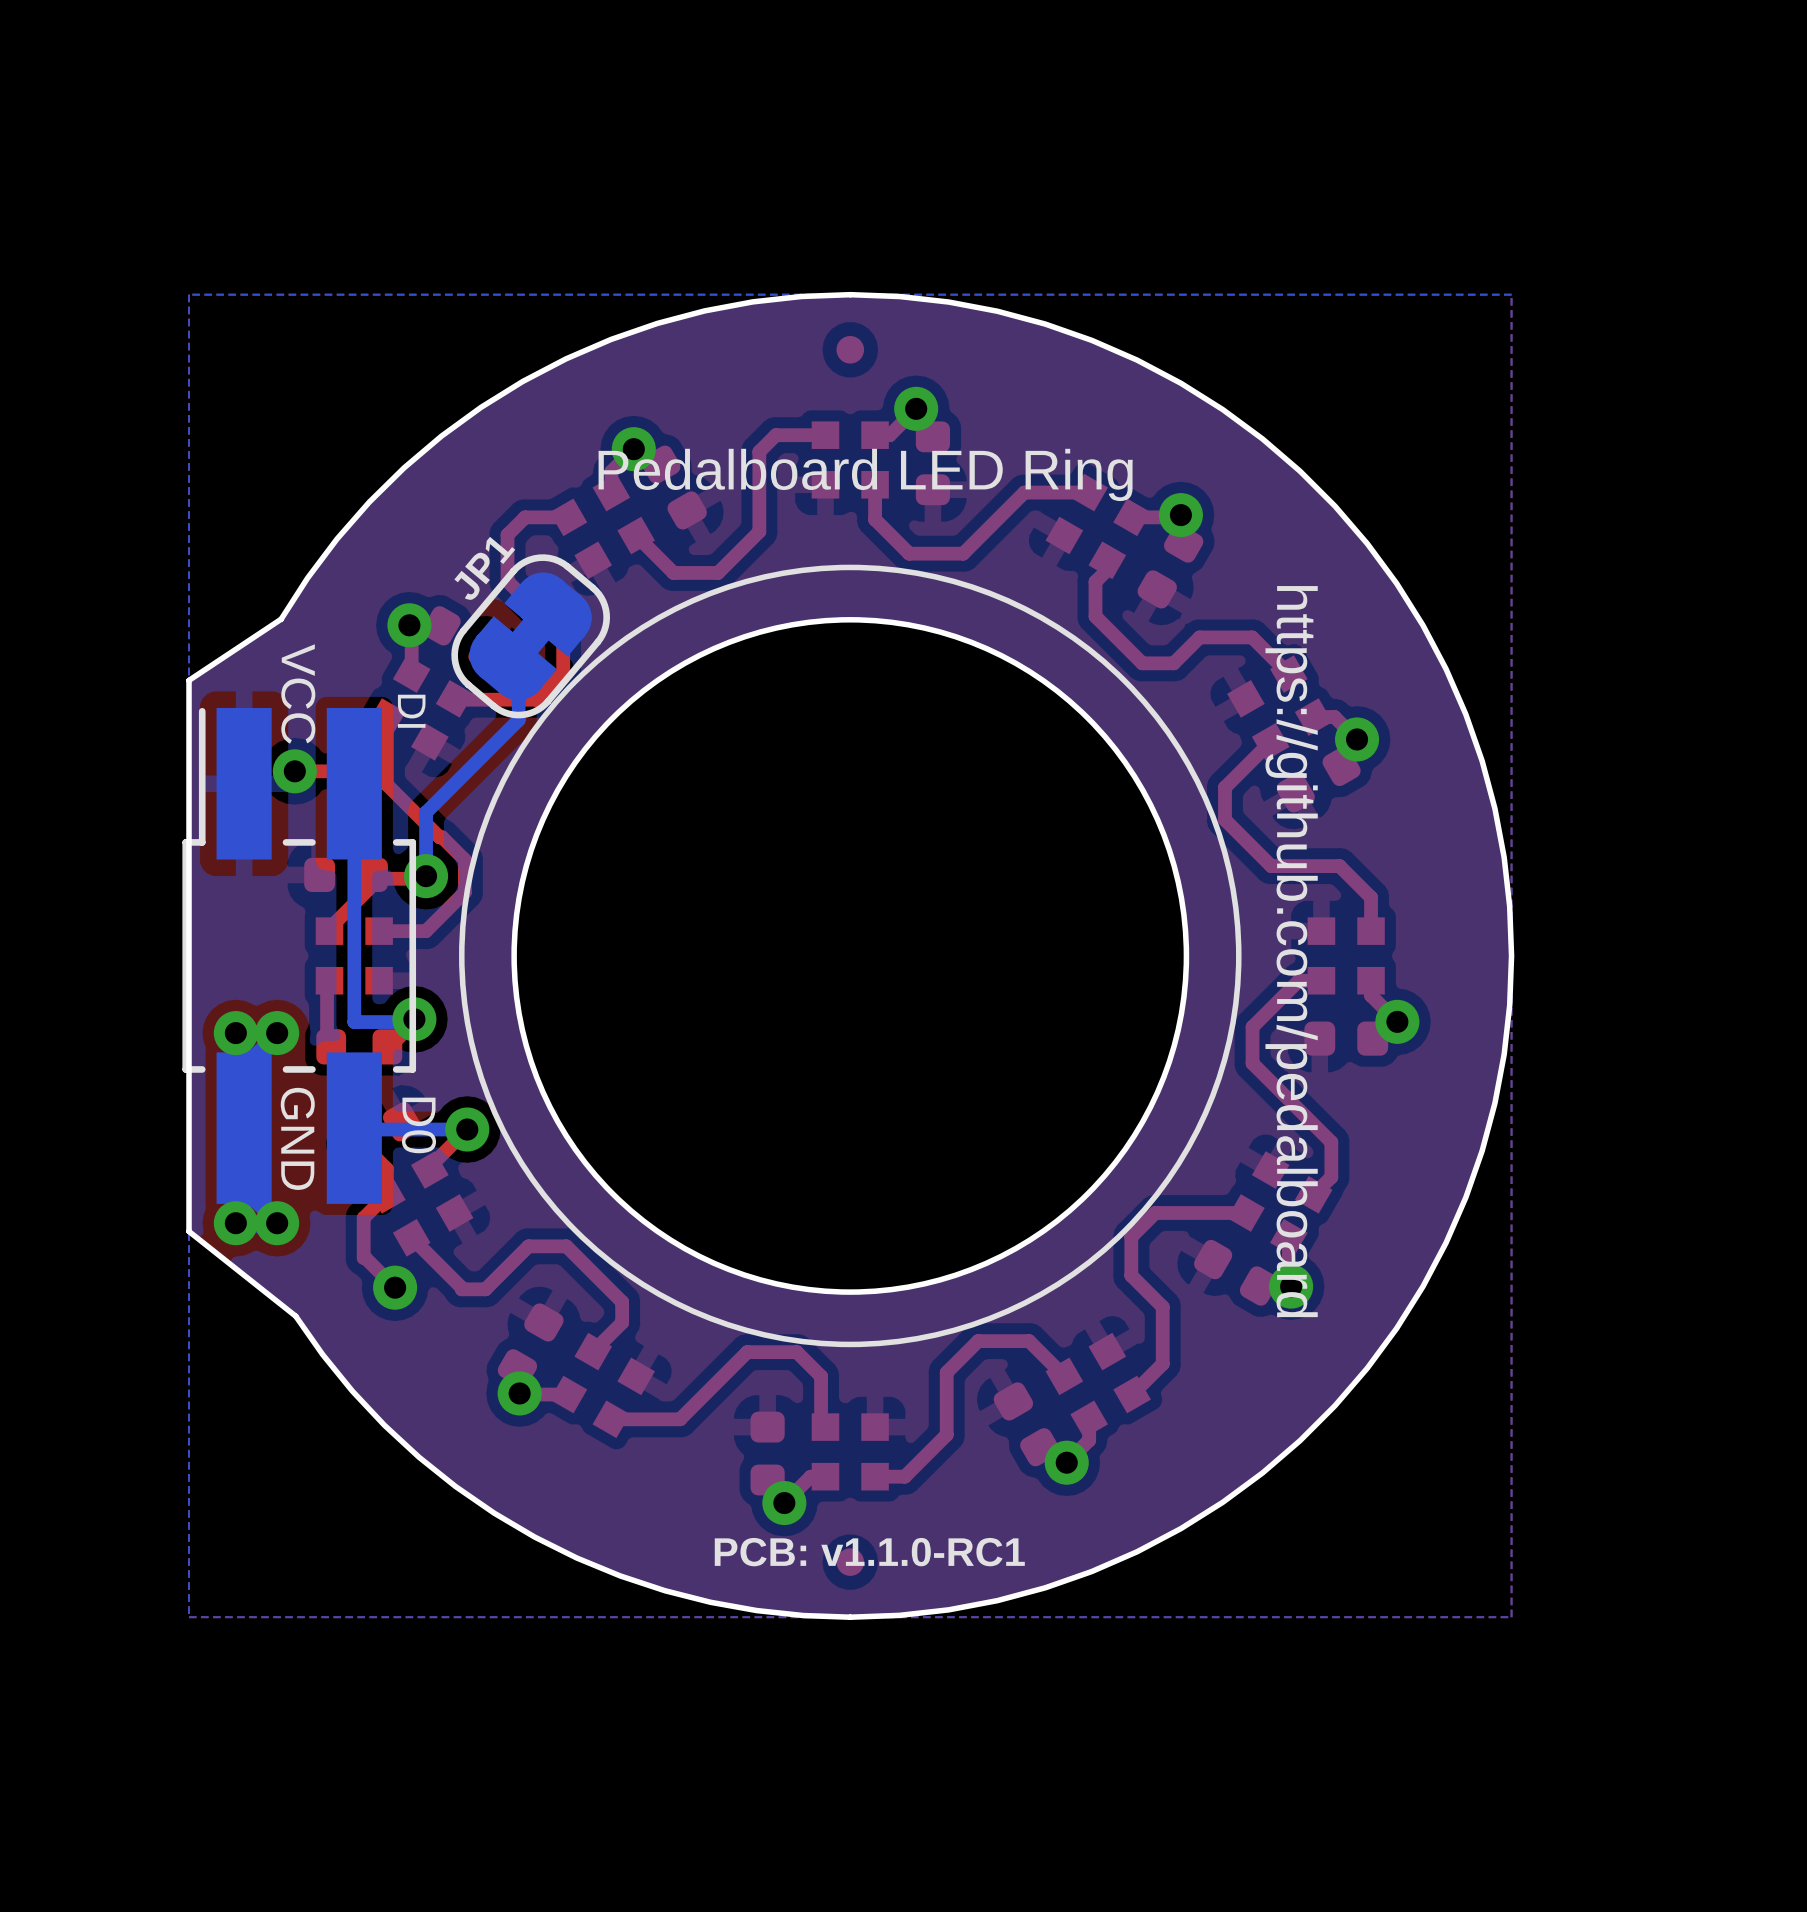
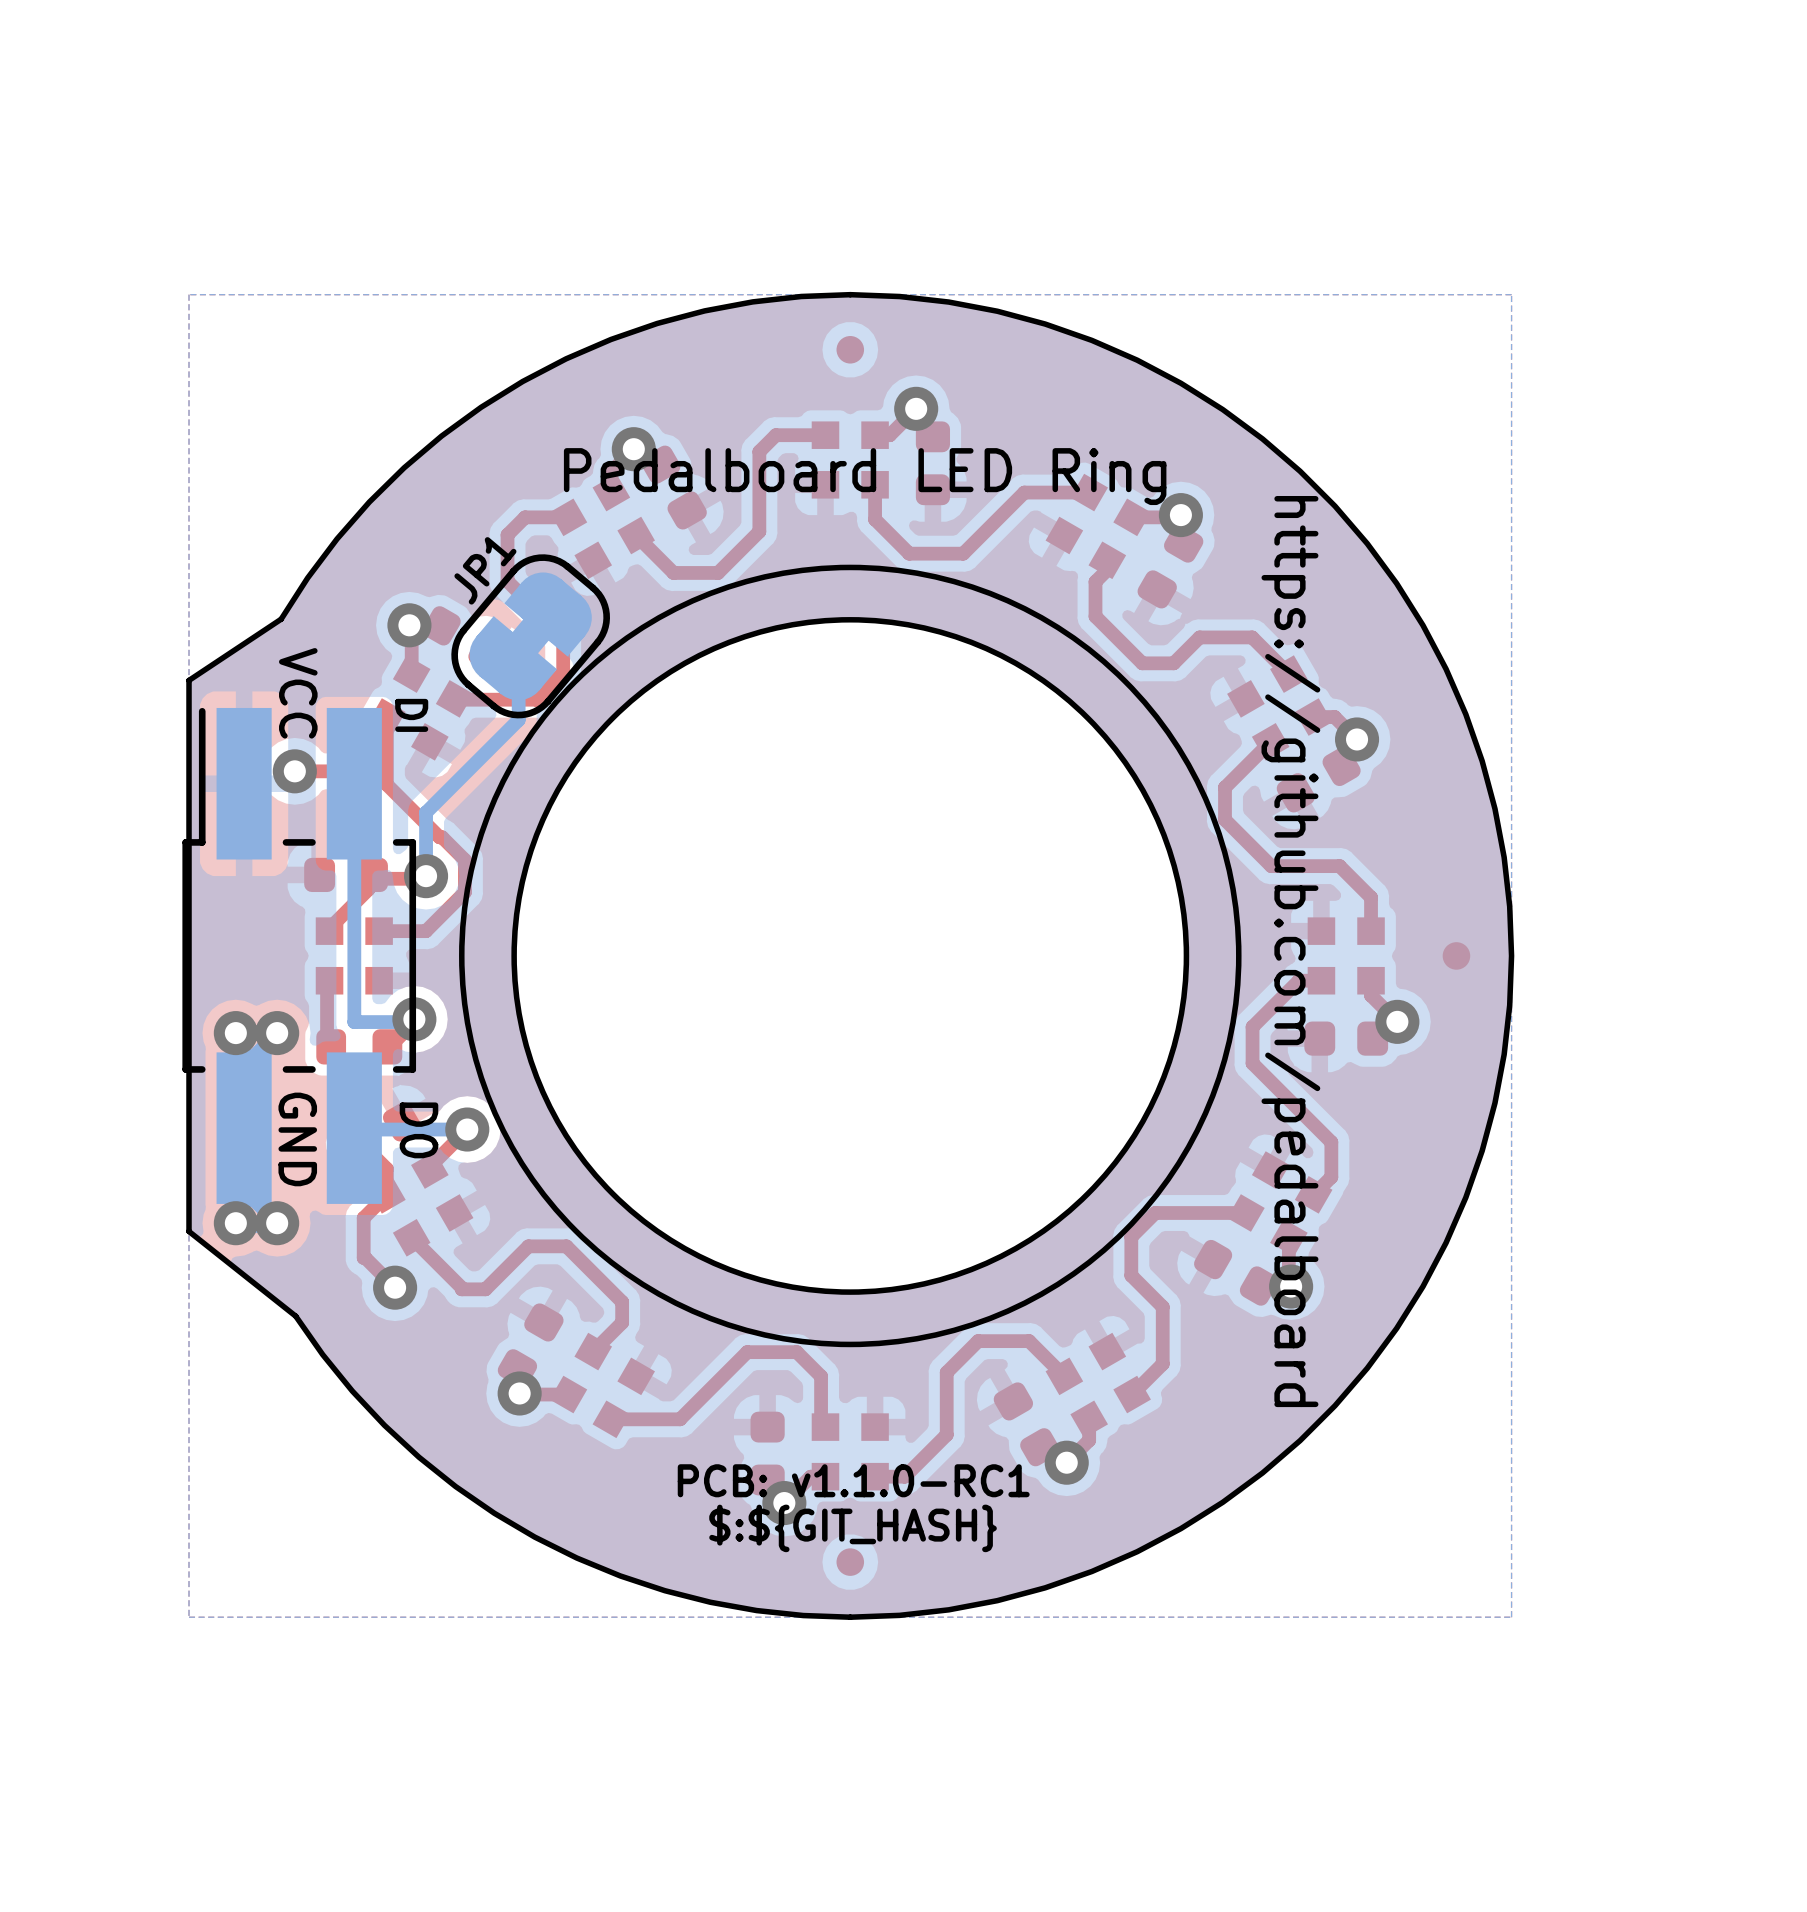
part: none -> (1456, 955)
text: none -> PCB: v1.1.0-RC1 (853, 1480)
text: PCB: v1.1.0-RC1 (869, 1552) -> $:${GIT_HASH} (853, 1528)

